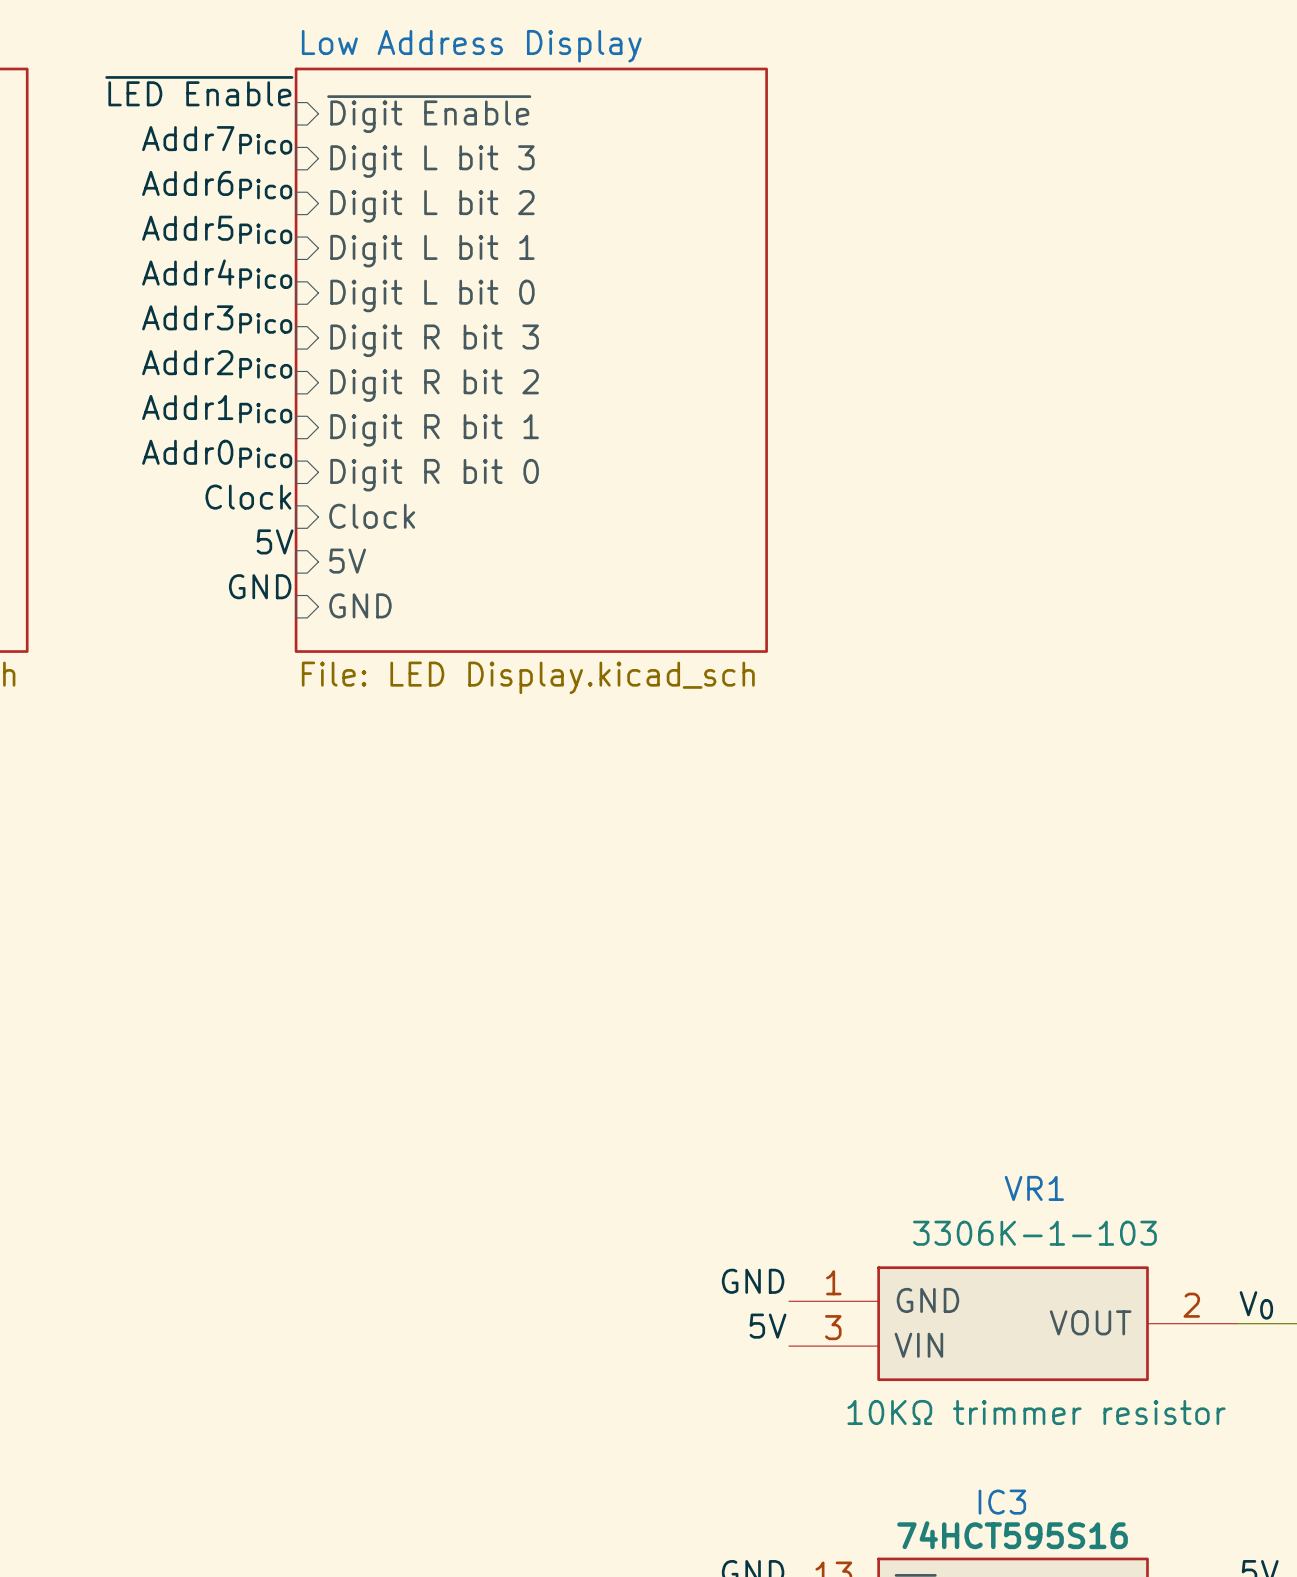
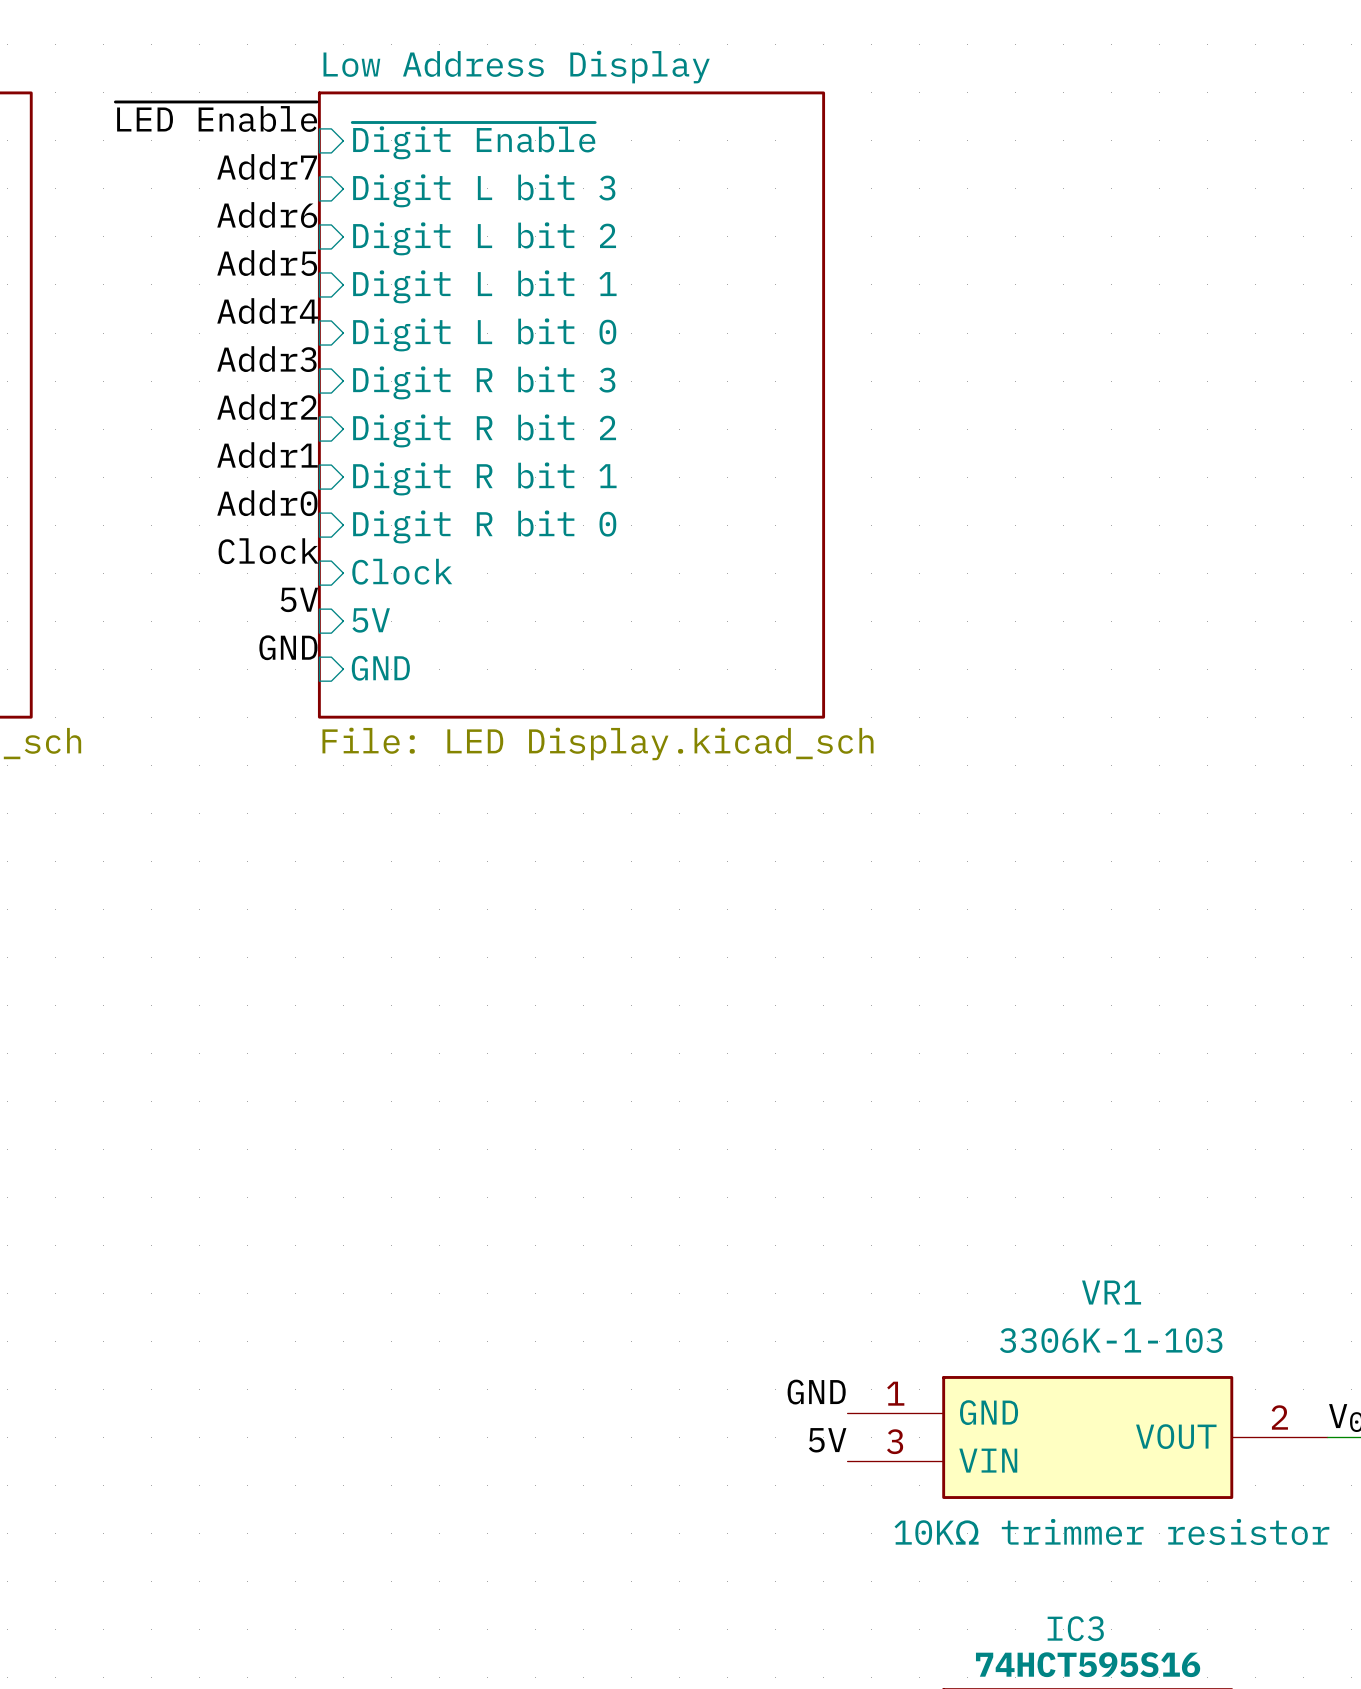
label: Addr7Pico (217, 140) -> Addr7 (267, 167)
label: Addr6Pico (217, 185) -> Addr6 (267, 215)
label: Addr5Pico (217, 229) -> Addr5 (267, 263)
label: Addr4Pico (217, 274) -> Addr4 (267, 311)
label: Addr3Pico (217, 319) -> Addr3 (266, 359)
label: Addr2Pico (217, 364) -> Addr2 (267, 407)
label: Addr1Pico (217, 409) -> Addr1 (267, 455)
label: Addr0Pico (217, 453) -> Addr0 (267, 503)

